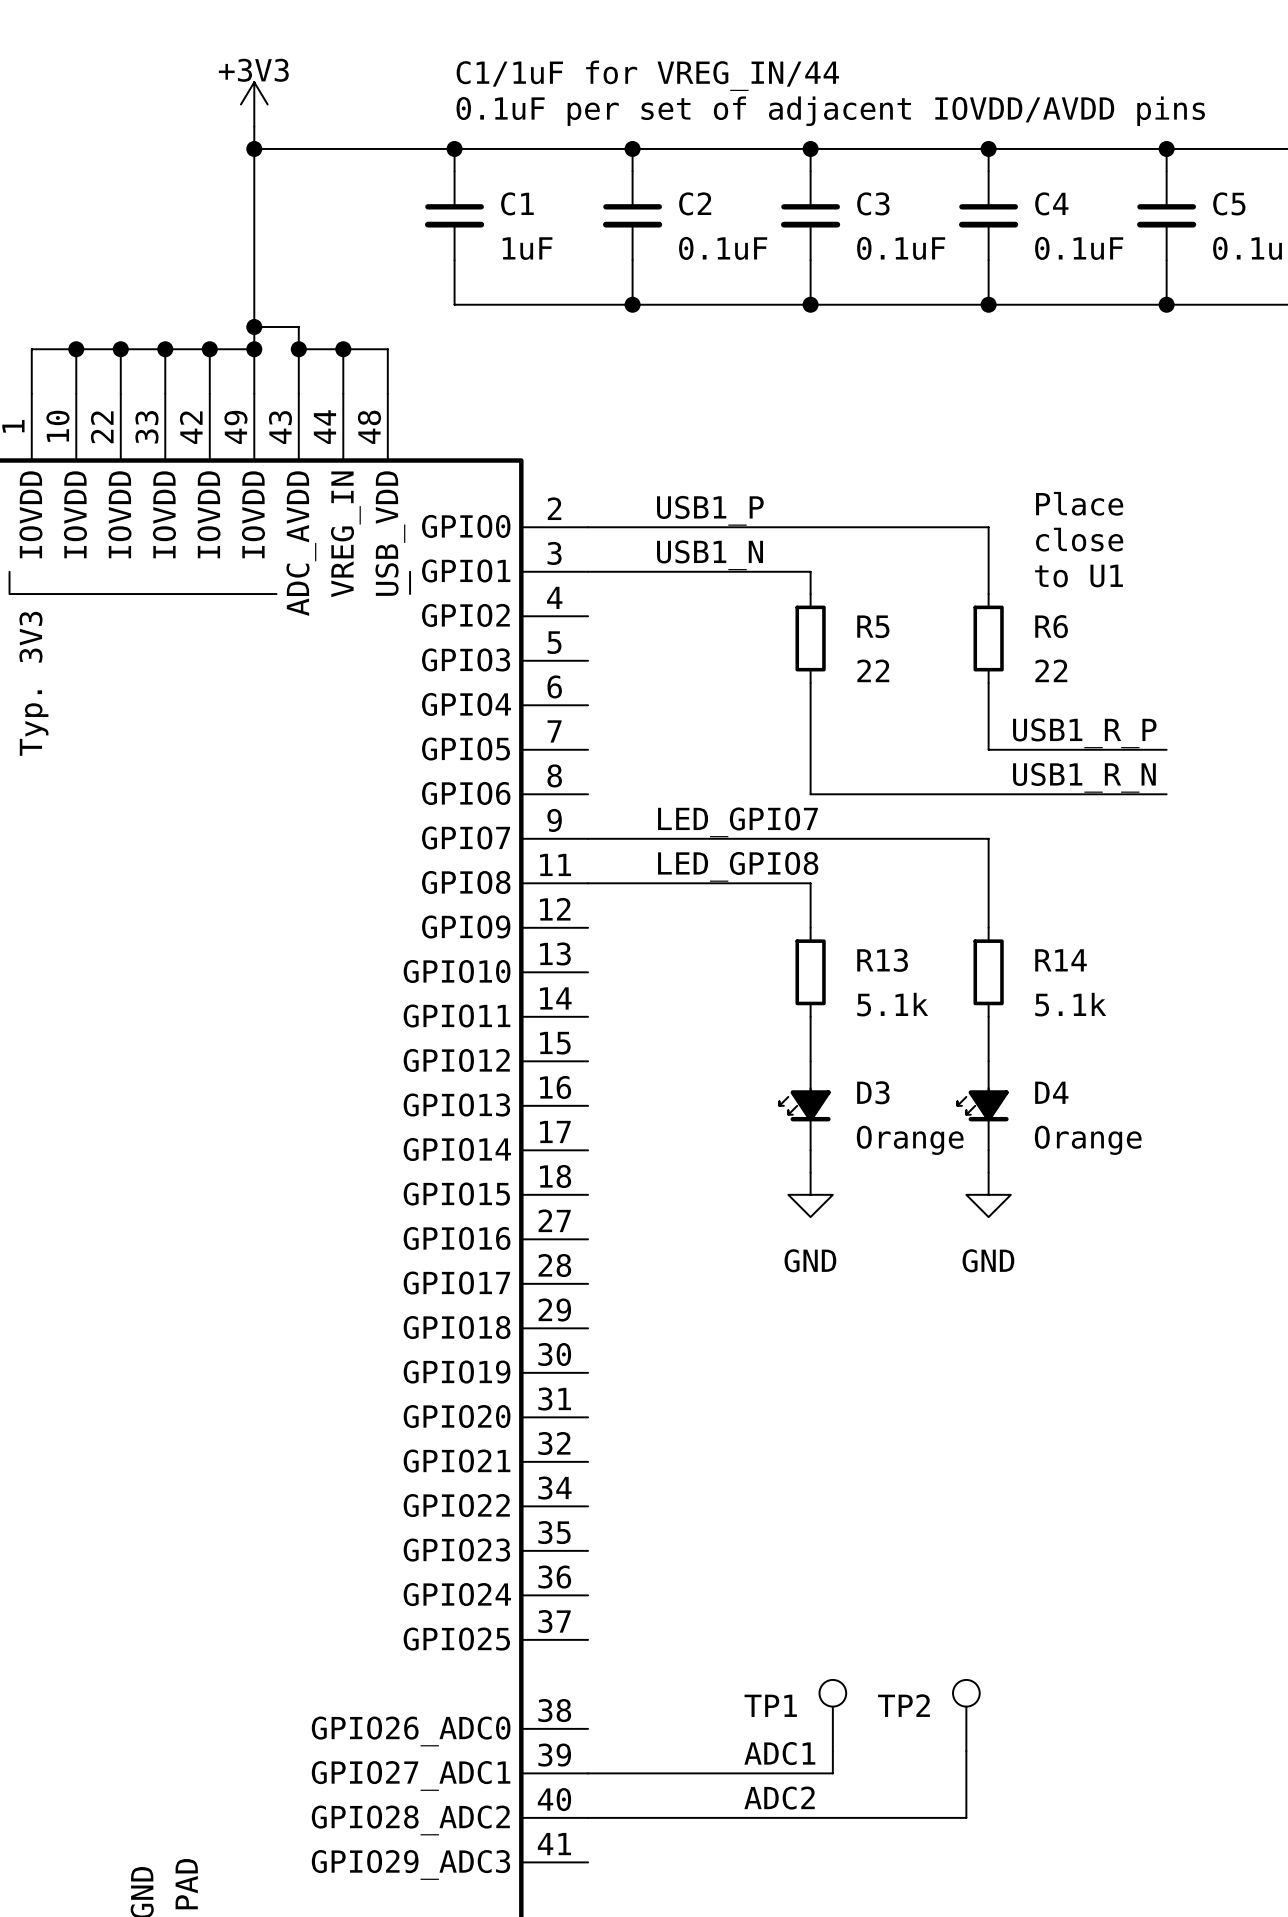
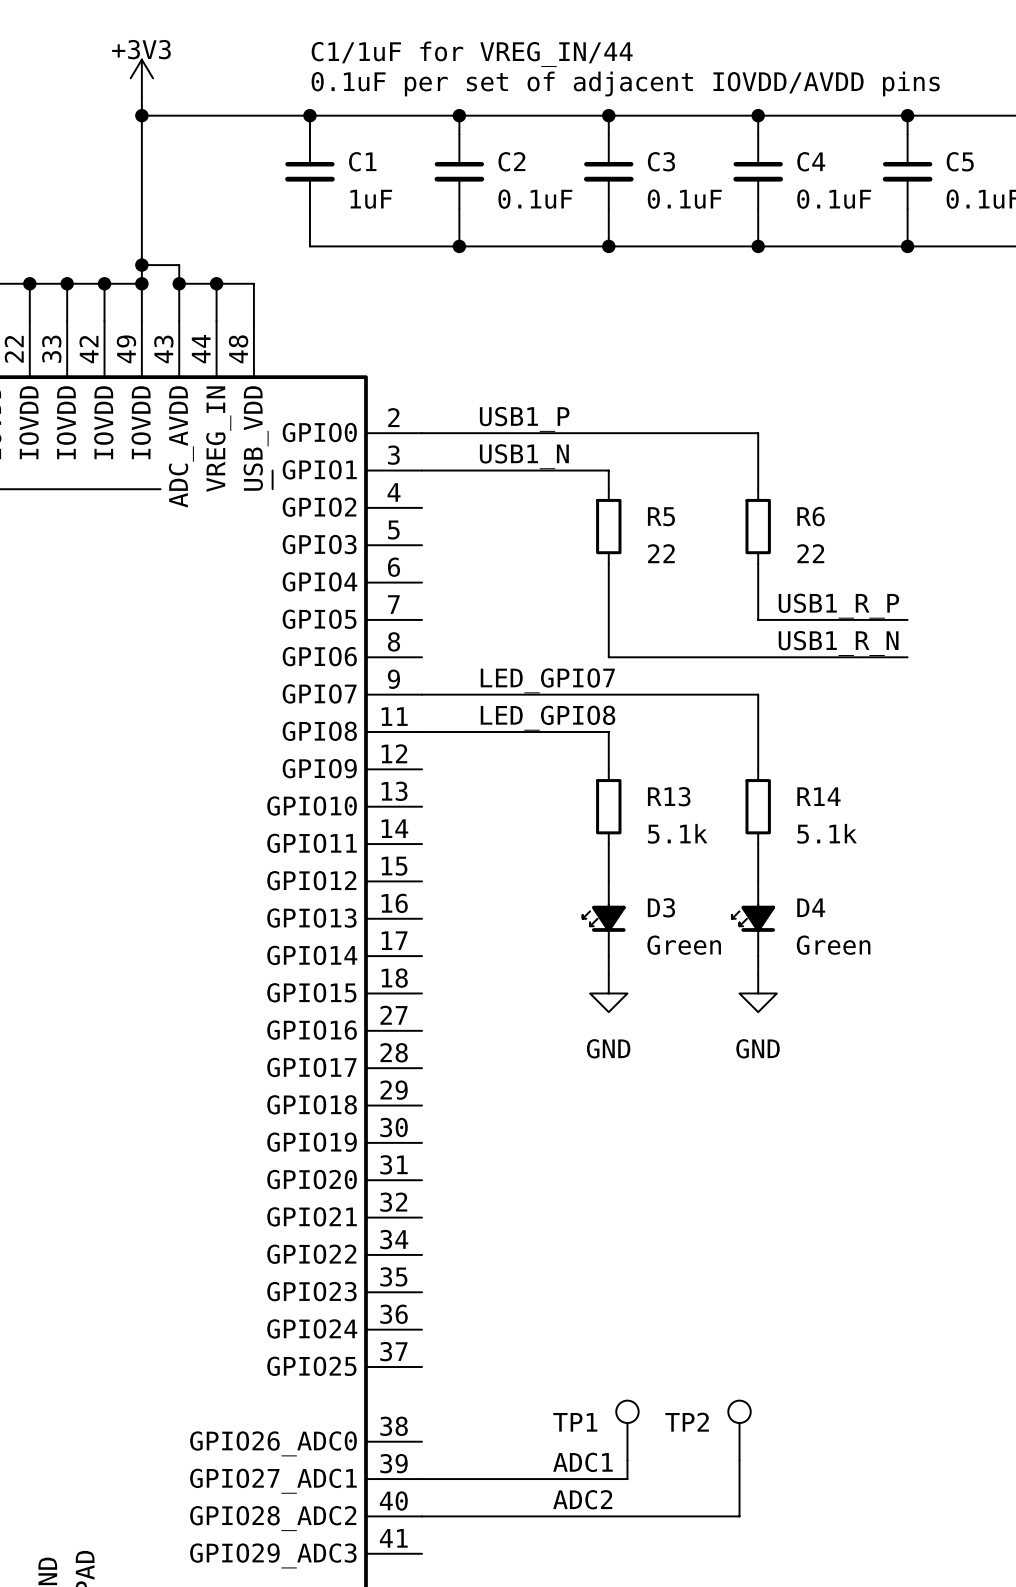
text: Place (1079, 503) -> none
text: close (1079, 539) -> none
text: to U1 (1079, 576) -> none
D3 value: Orange (910, 1140) -> Green (684, 945)
D4 value: Orange (1088, 1140) -> Green (833, 945)

